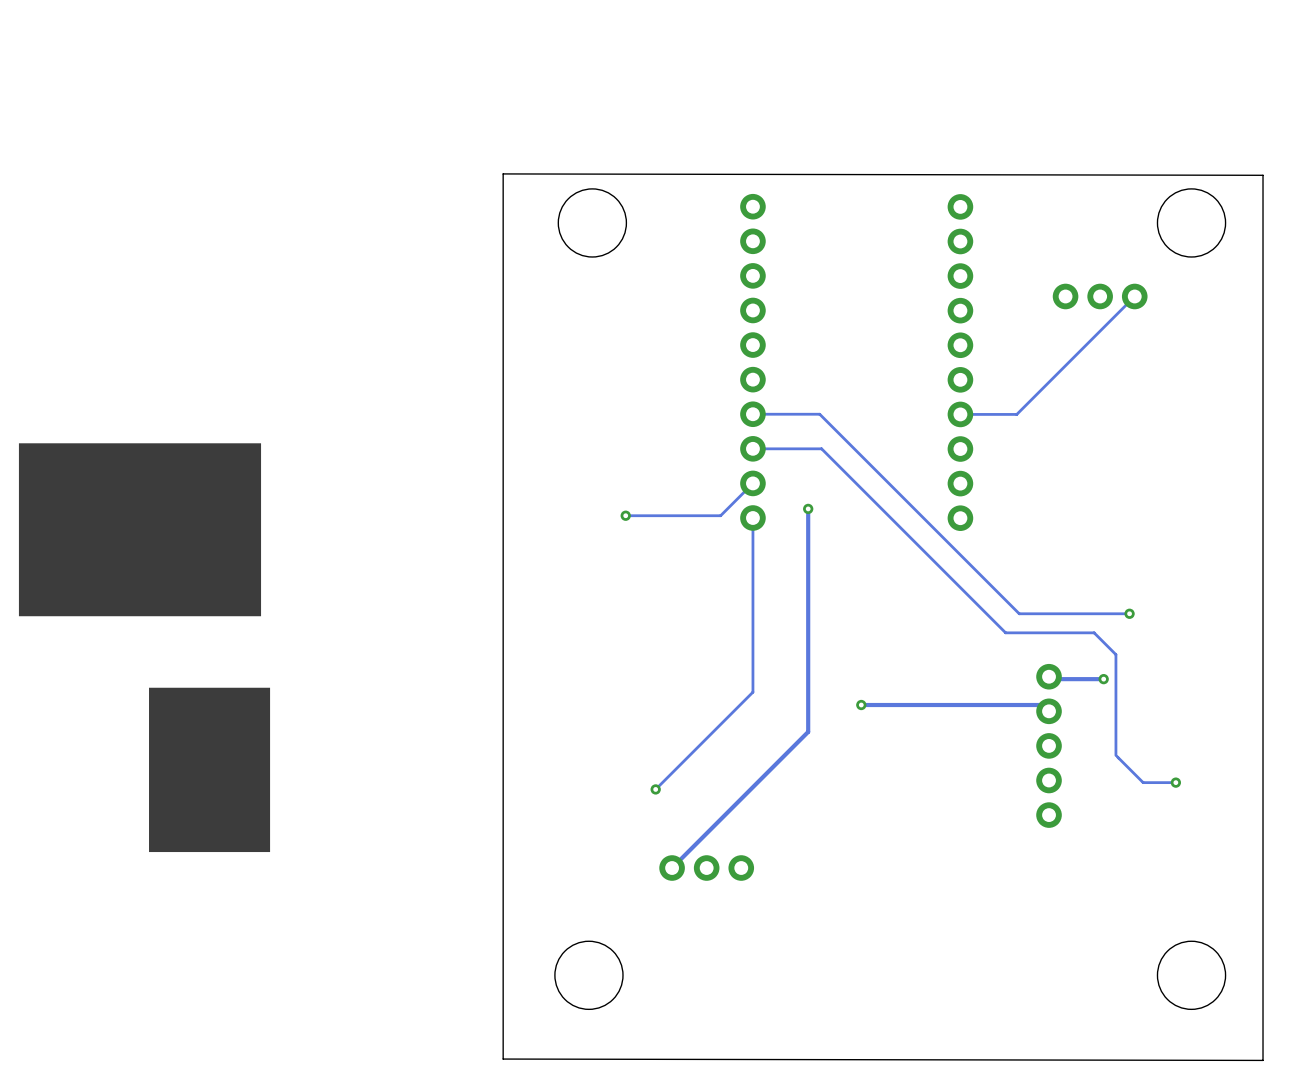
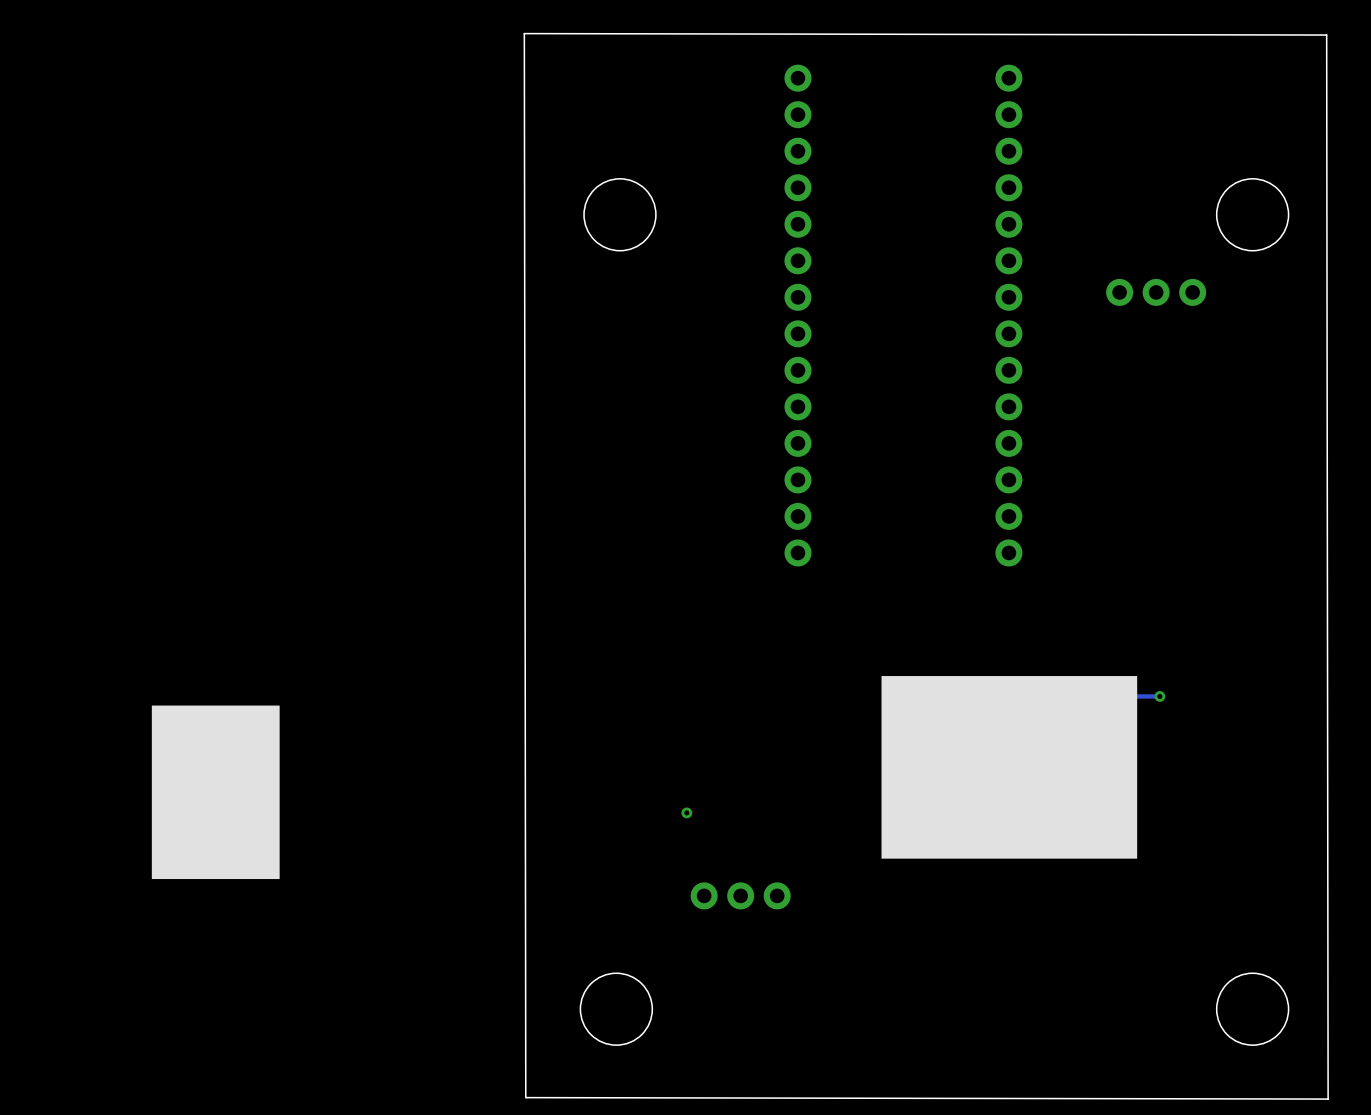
track: (1134, 296) (1016, 414) (960, 414) -> none
part: none -> (797, 315)
part: none -> (1008, 315)
part: (752, 362) -> none
part: (960, 362) -> none
track: (752, 414) (819, 414) (1019, 613) (1129, 613) -> none
drawing: [18, 443, 262, 617] -> none
track: (752, 448) (821, 448) (1005, 632) (1094, 632) (1115, 654) (1115, 755) (1118, 758) -> none
track: (752, 483) (720, 515) (625, 515) -> none
track: (808, 508) (808, 731) (672, 868) -> none
via: (808, 508) -> none
via: (625, 515) -> none
track: (752, 518) (752, 692) (655, 789) -> none
via: (1129, 613) -> none
drawing: none -> [881, 676, 1138, 859]
via: (861, 705) -> none
track: (1042, 705) (861, 705) -> none
track: (1117, 756) (1143, 782) (1175, 782) -> none
via: (1175, 782) -> none
board edge: (503, 1059) (503, 173) (1263, 175) (1263, 1060) -> (525, 1097) (524, 33) (1326, 35) (1328, 1099)

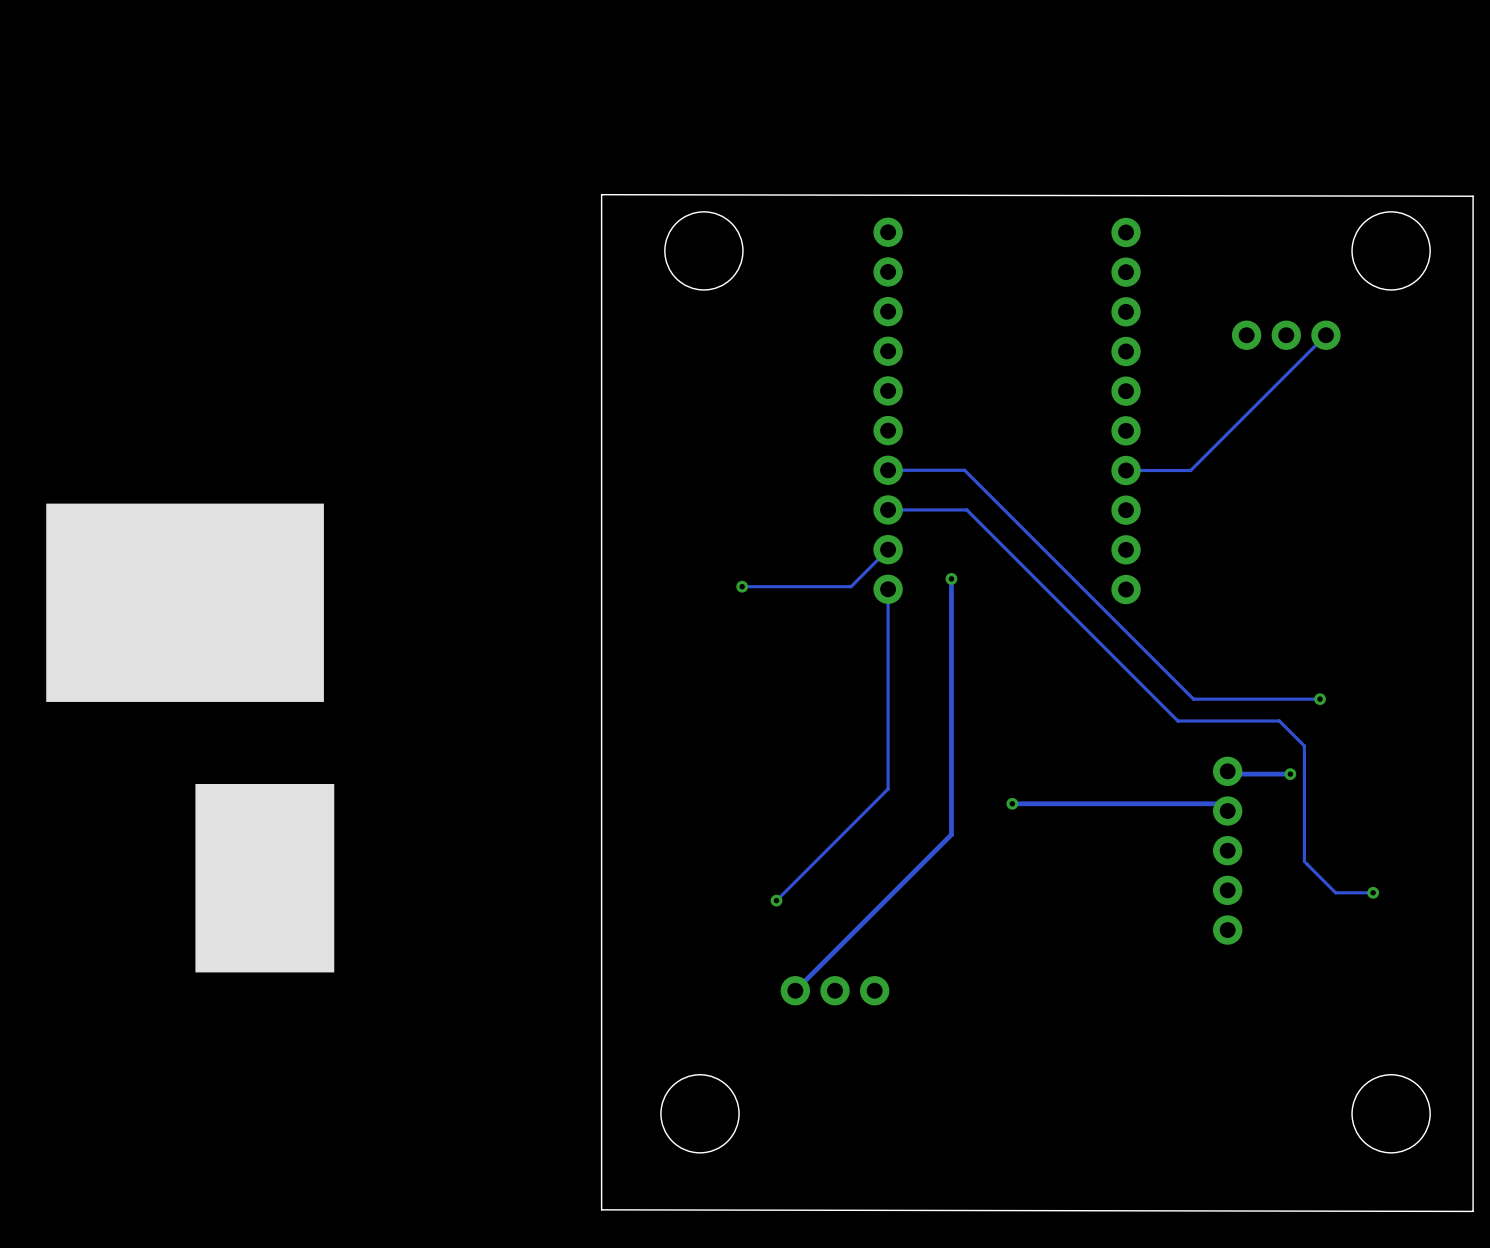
track: none -> (1325, 335) (1190, 470) (1126, 470)
part: (797, 315) -> none
part: (1008, 315) -> none
part: none -> (888, 410)
part: none -> (1126, 411)
track: none -> (888, 470) (964, 470) (1193, 699) (1320, 699)
drawing: none -> [46, 503, 324, 702]
track: none -> (888, 509) (966, 509) (1177, 721) (1279, 721) (1304, 745) (1304, 861) (1307, 864)
track: none -> (888, 549) (851, 586) (742, 586)
track: none -> (951, 578) (951, 834) (795, 990)
via: none -> (951, 578)
via: none -> (742, 586)
track: none -> (888, 589) (888, 789) (776, 900)
via: none -> (1320, 699)
drawing: [881, 676, 1138, 859] -> none
via: none -> (1012, 803)
track: none -> (1220, 803) (1012, 803)
track: none -> (1305, 863) (1335, 892) (1373, 892)
via: none -> (1373, 892)
board edge: (525, 1097) (524, 33) (1326, 35) (1328, 1099) -> (601, 1209) (601, 194) (1473, 196) (1473, 1211)

